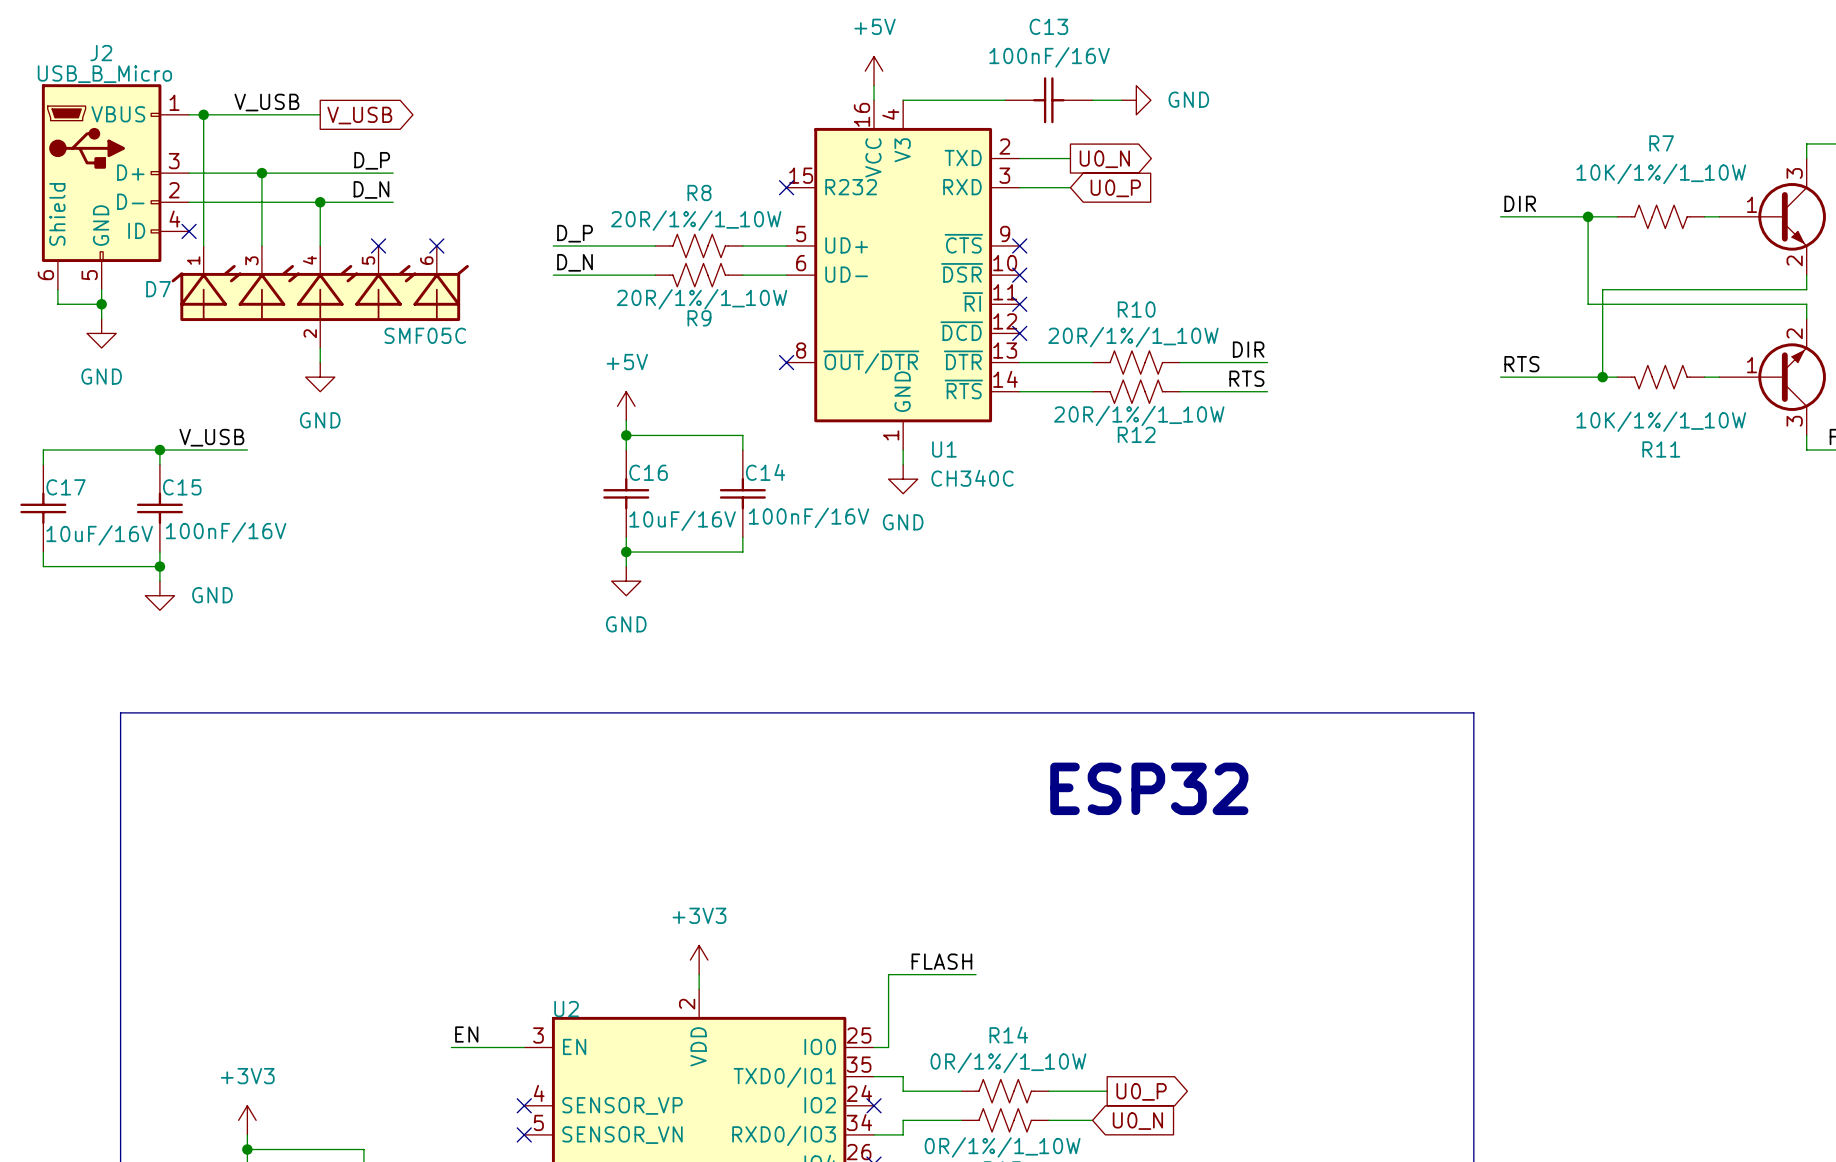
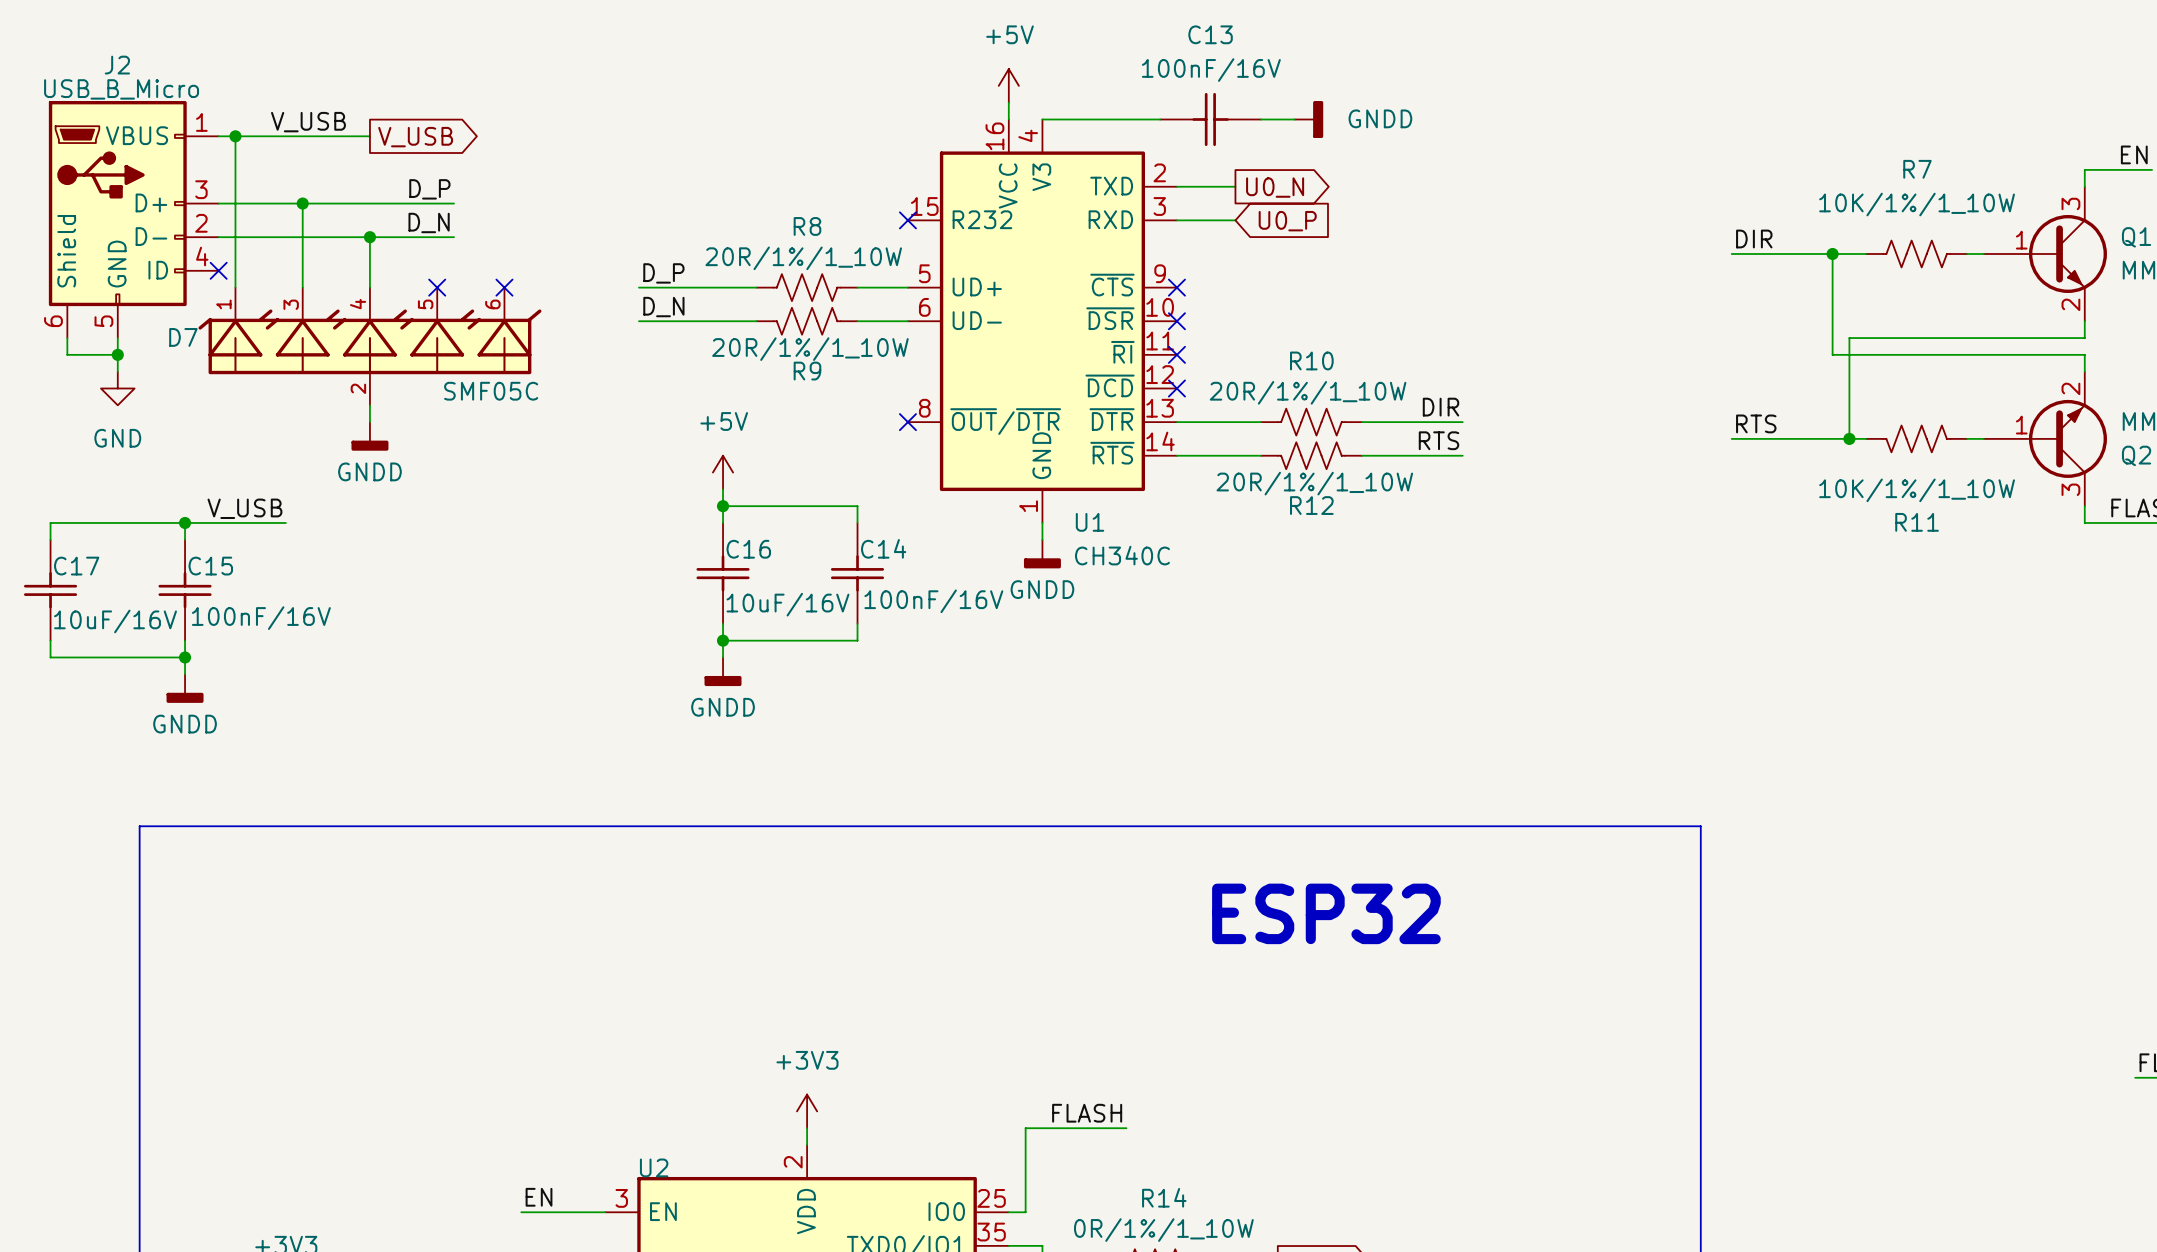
power symbol: GND (1136, 100) -> GNDD (1308, 119)
power symbol: GND (320, 377) -> GNDD (369, 436)
power symbol: GND (903, 479) -> GNDD (1042, 554)
power symbol: GND (626, 581) -> GNDD (723, 671)
power symbol: GND (159, 595) -> GNDD (185, 688)

